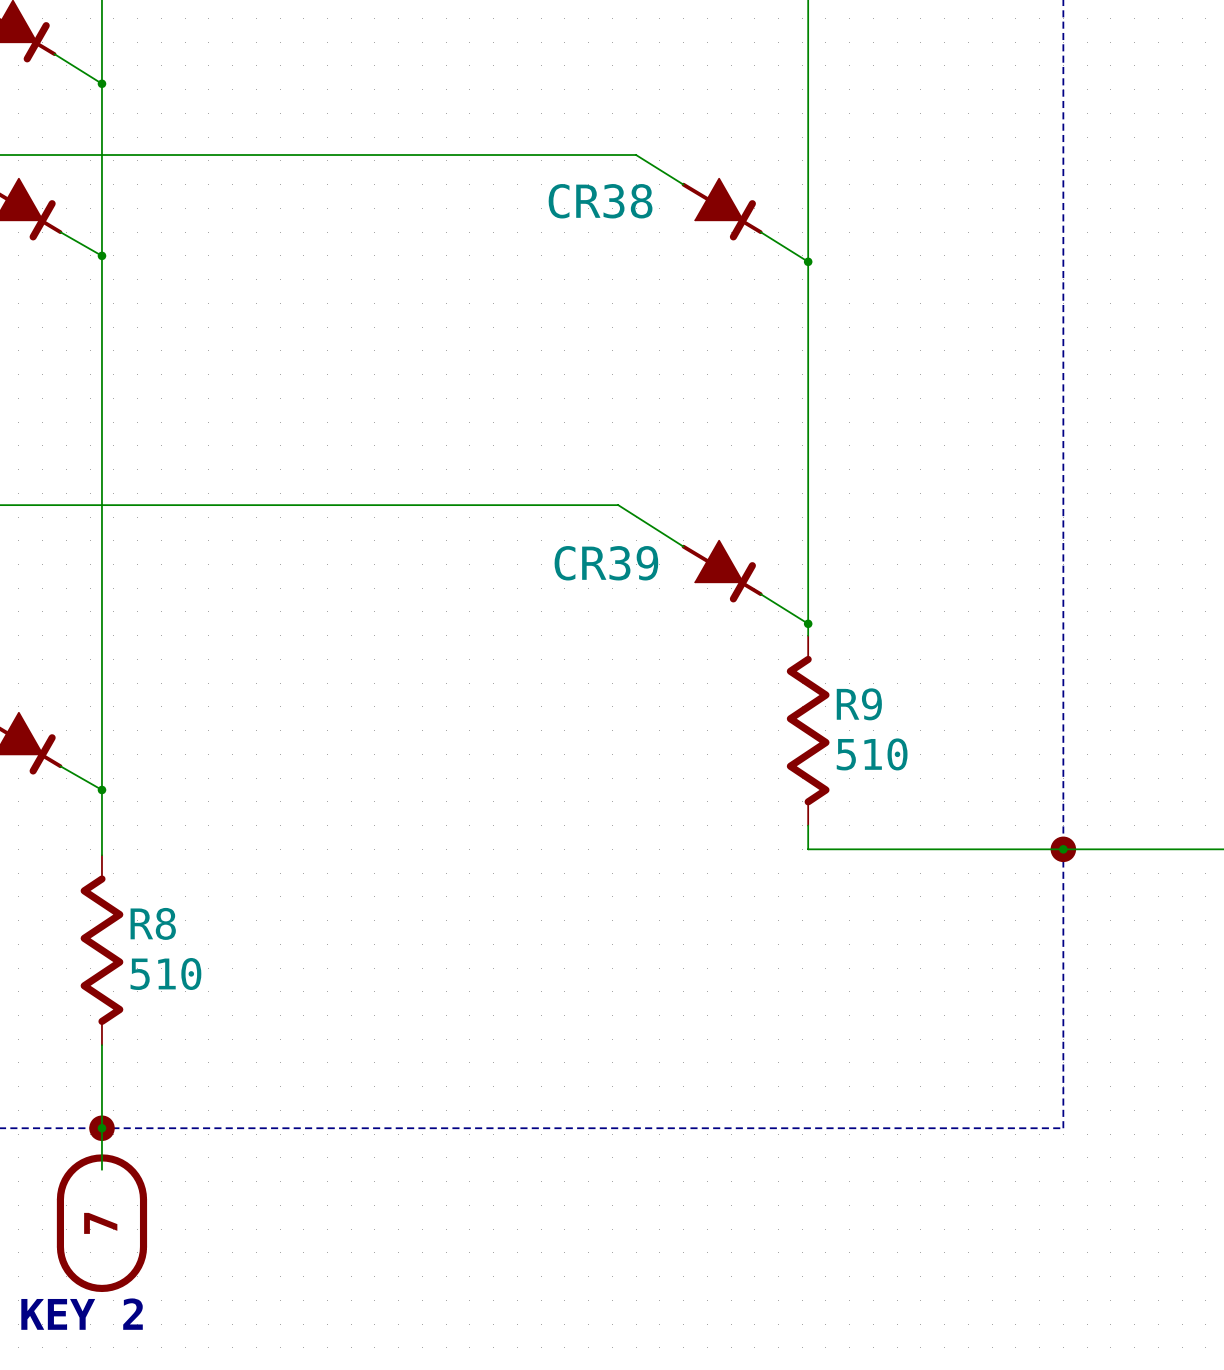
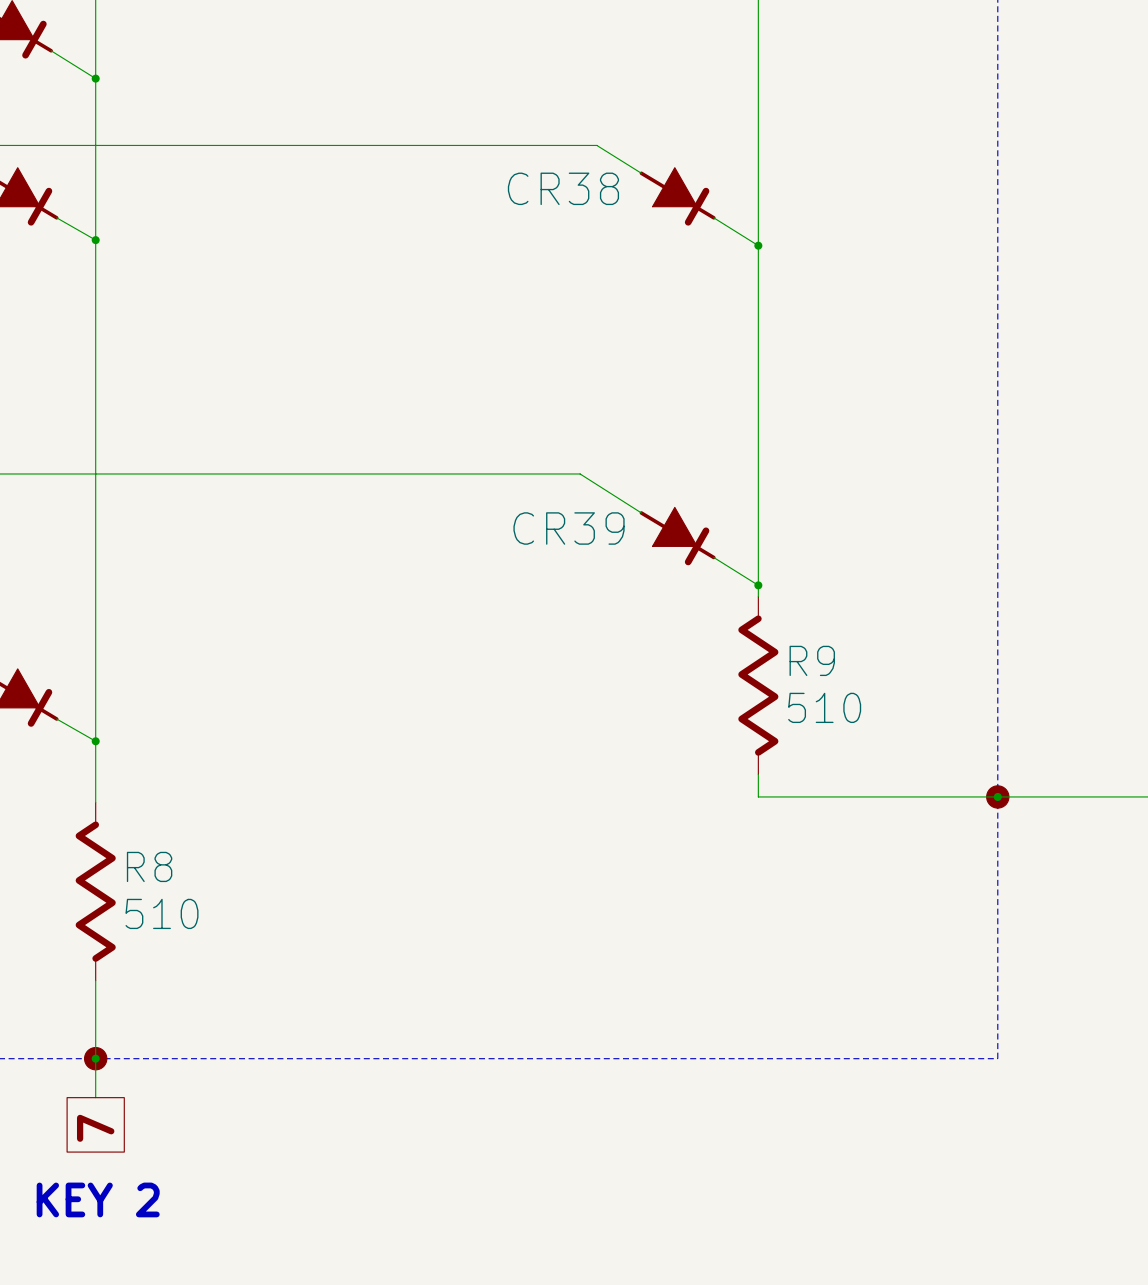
global label: none -> 7 (95, 1128)
part: (101, 1223) -> none
text position: KEY 2 (82, 1314) -> KEY 2 (98, 1199)

